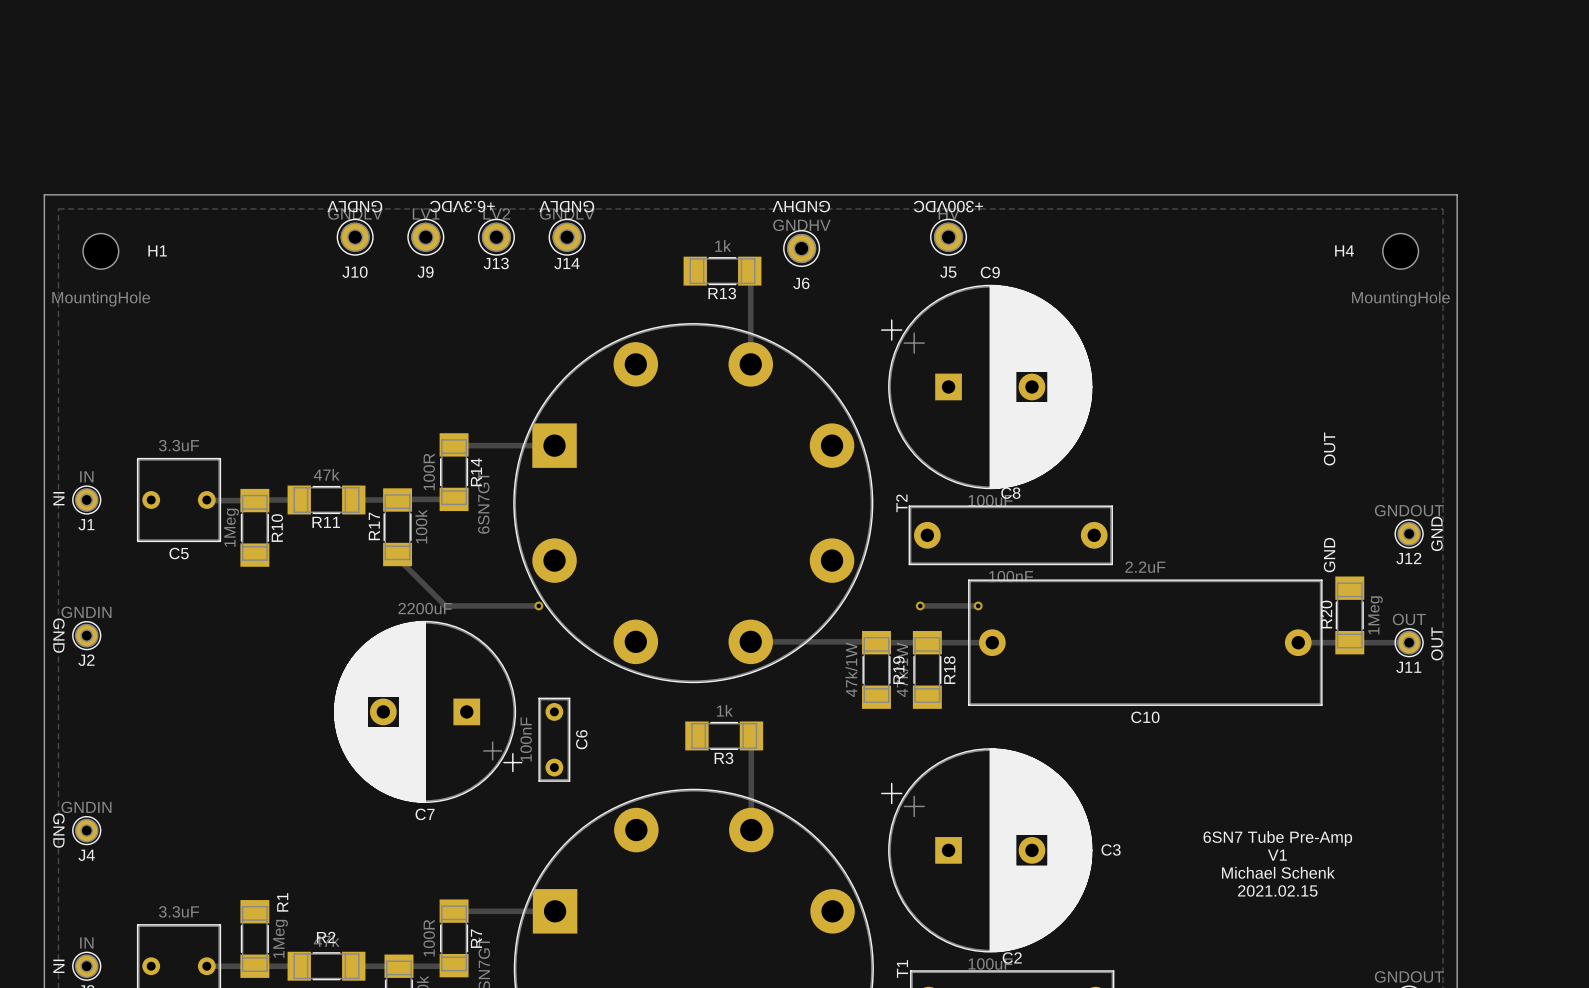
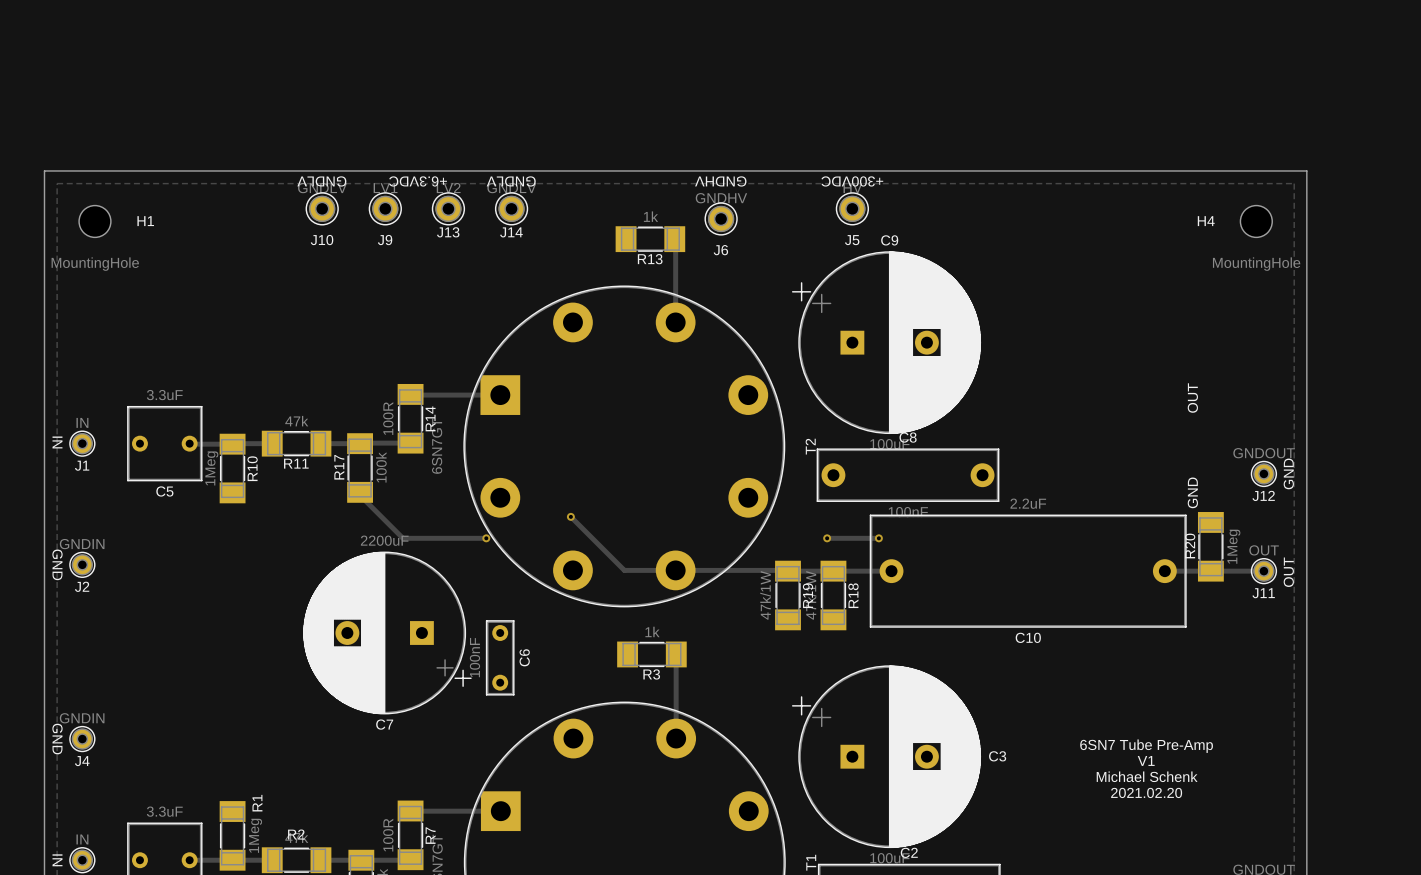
track: none -> (570, 516) (624, 570) (675, 570)
via: none -> (570, 516)
text: 2021.02.15 (1277, 890) -> 2021.02.20 (1146, 792)

